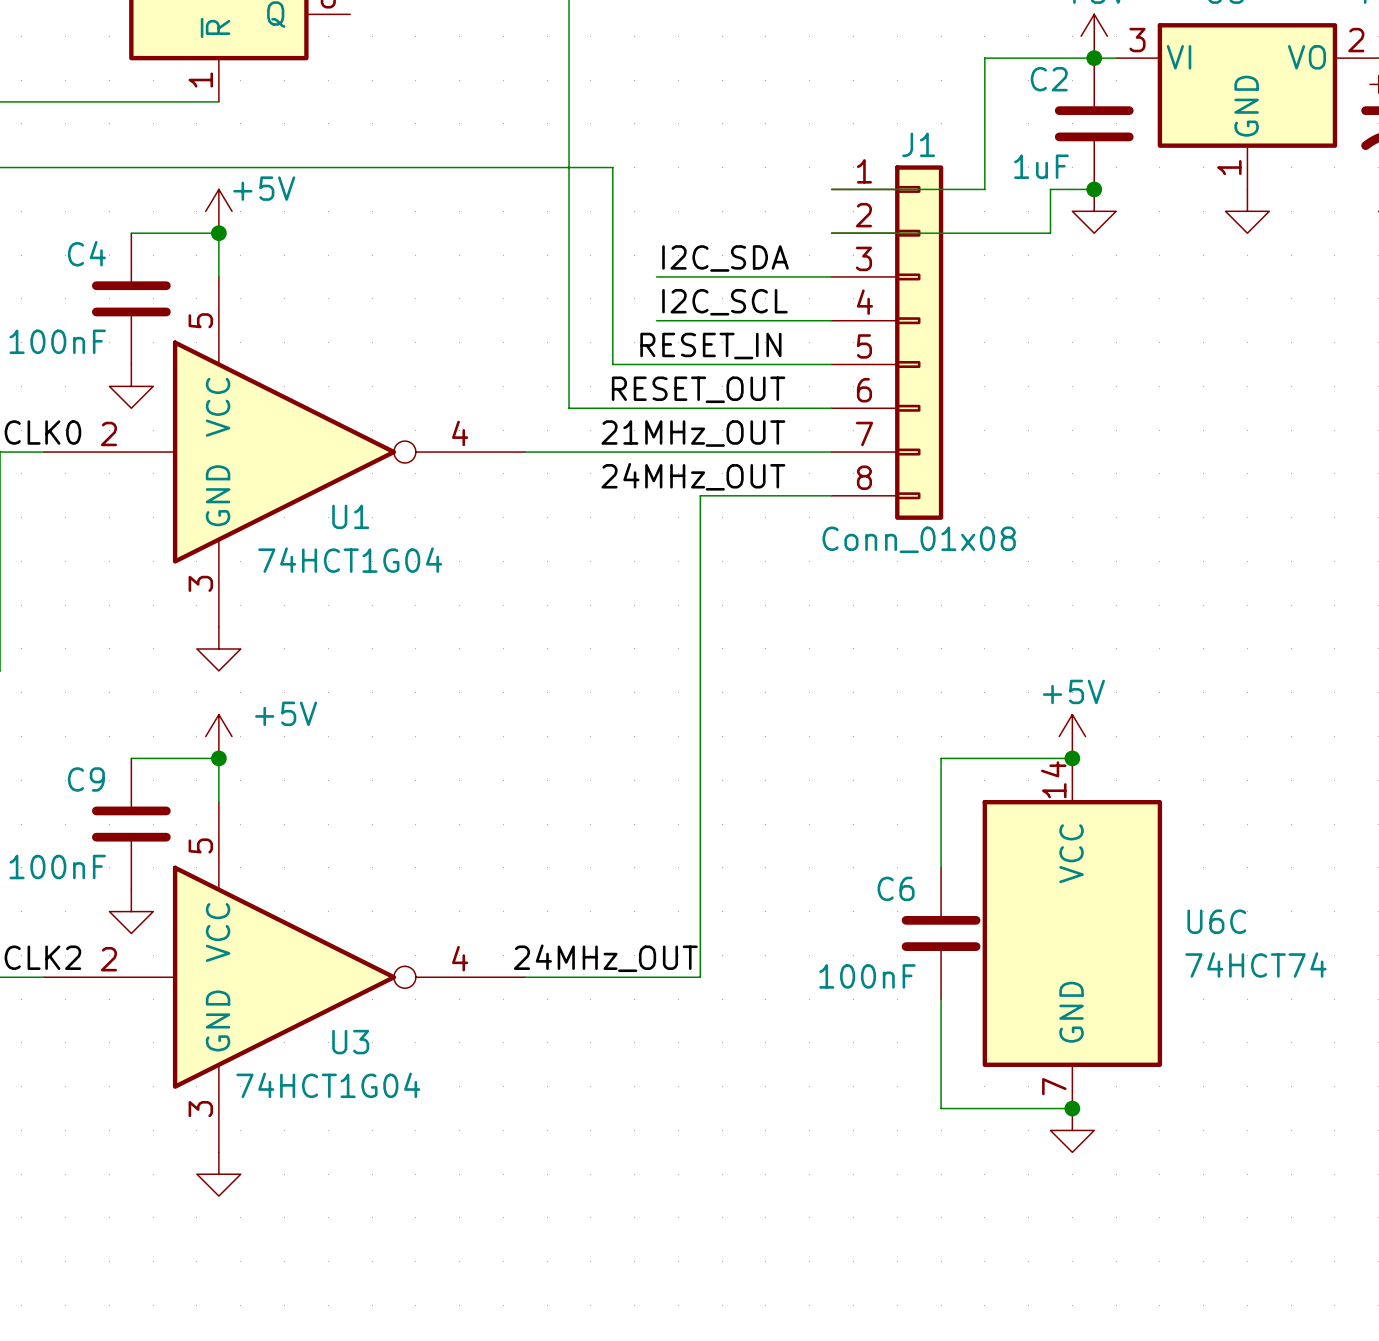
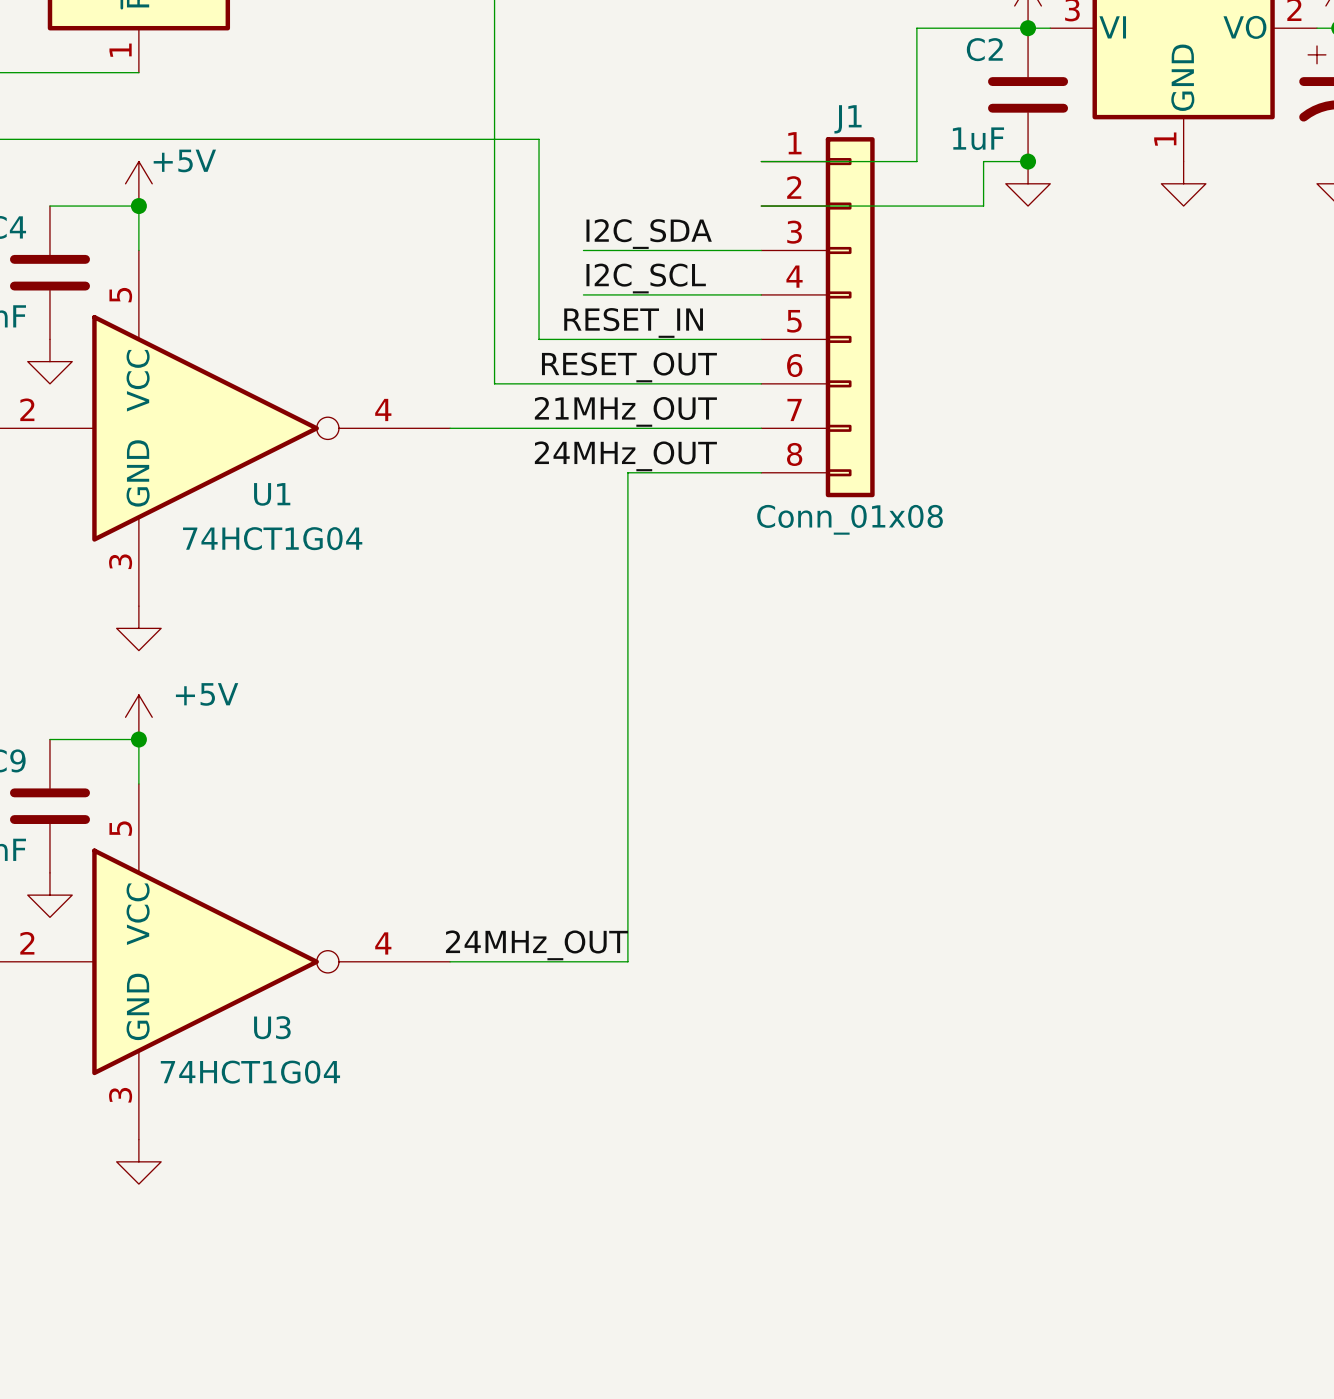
power symbol: +5V (1072, 736) -> none
wire: (1072, 758) (941, 758) (941, 867) -> none
junction: (1072, 758) -> none
C6: 100nF (941, 933) -> none
U6C: 74HCT74 (1072, 933) -> none
wire: (941, 999) (941, 1108) (1072, 1108) -> none
junction: (1072, 1108) -> none
power symbol: (1072, 1130) -> none

